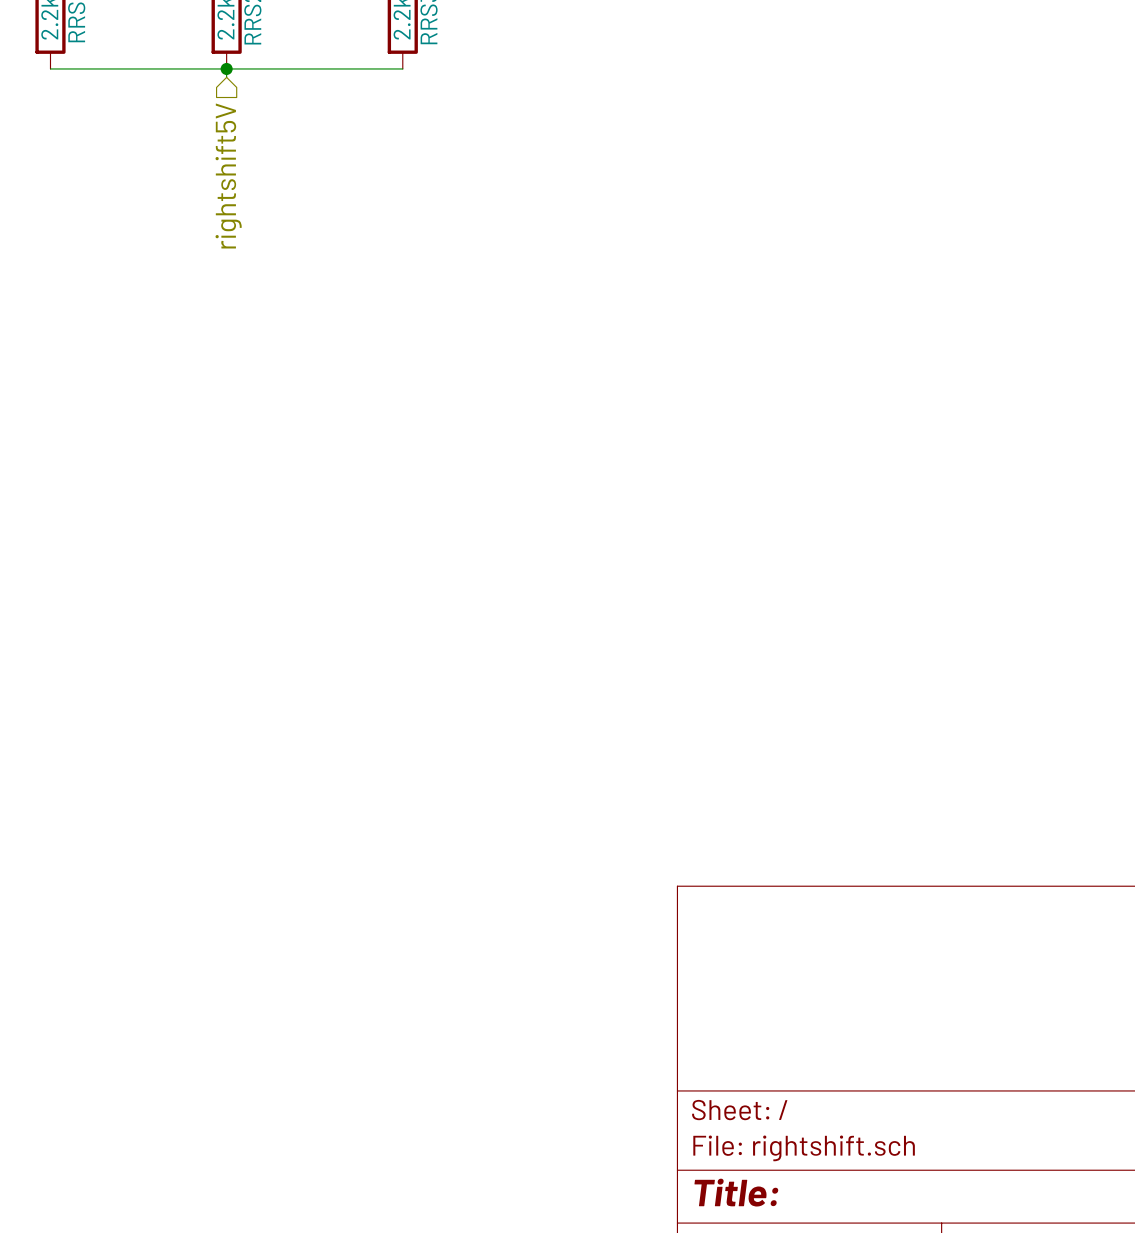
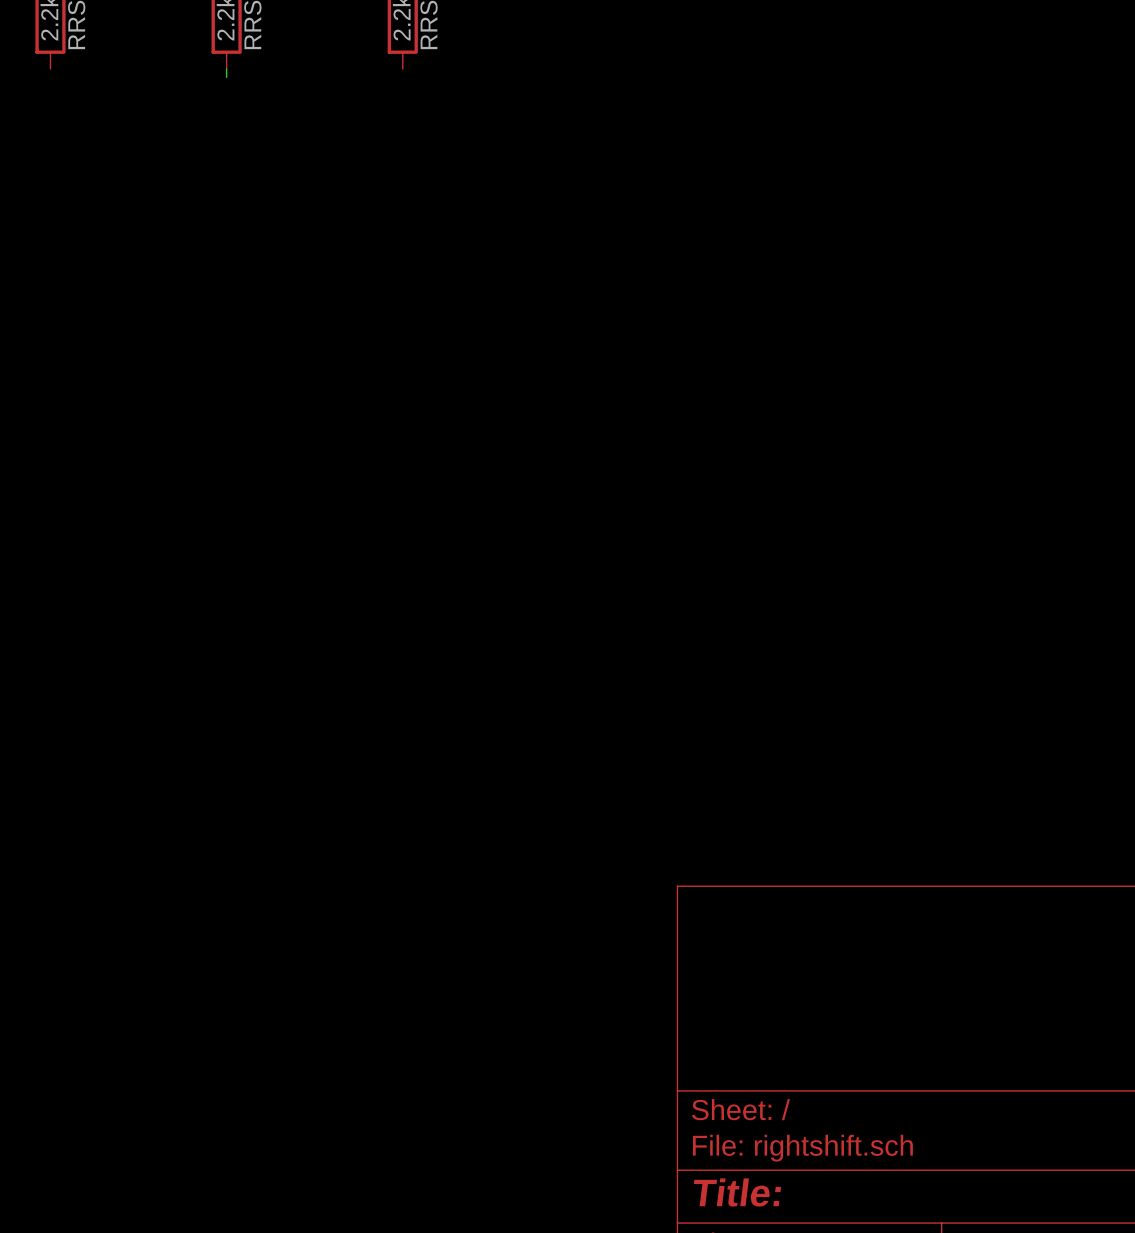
wire: (50, 68) (402, 68) -> none
junction: (226, 68) -> none
hierarchical label: rightshift5V (228, 175) -> none

